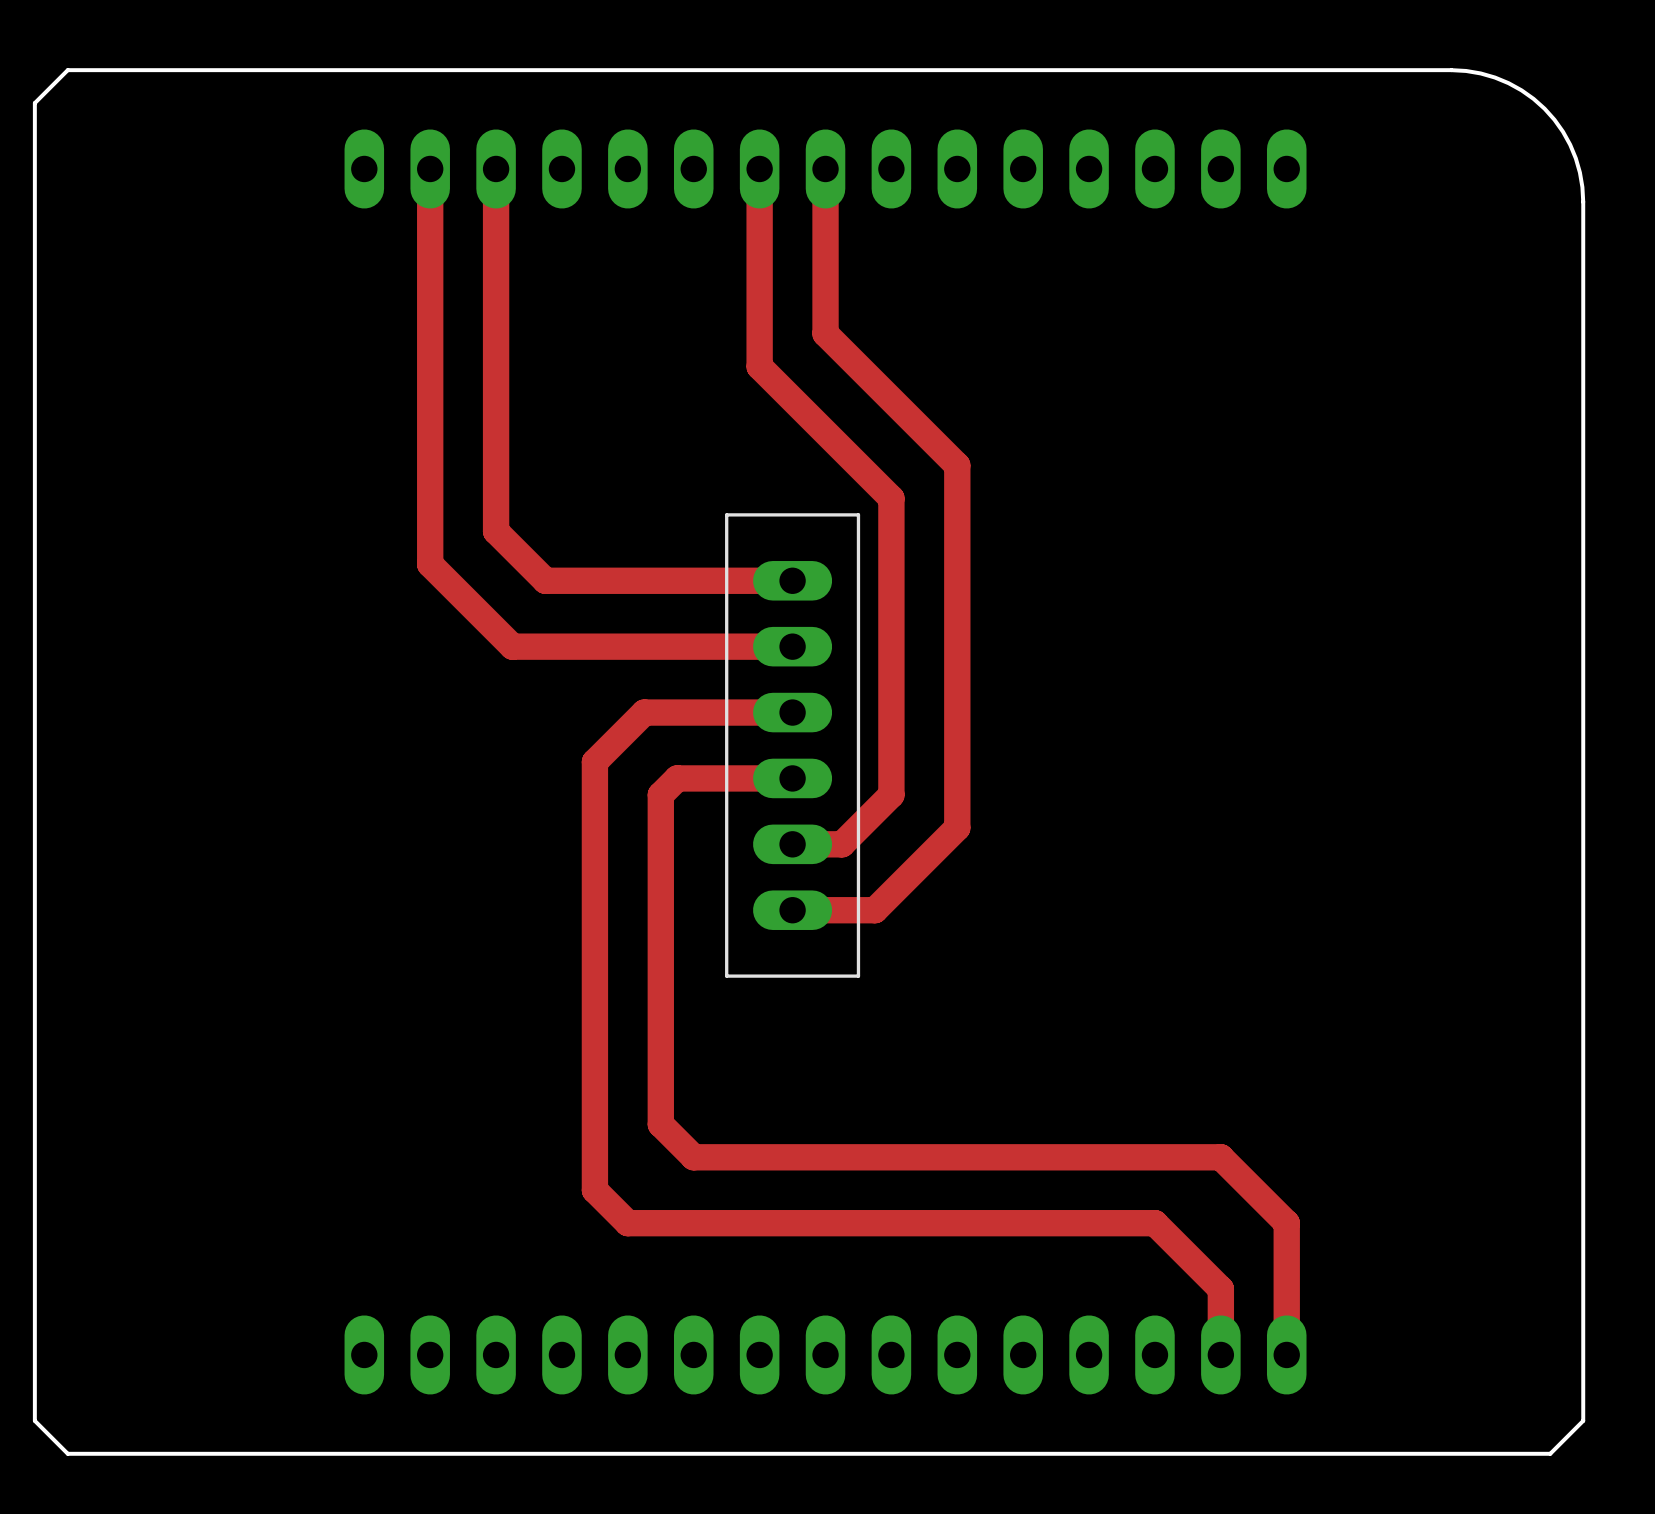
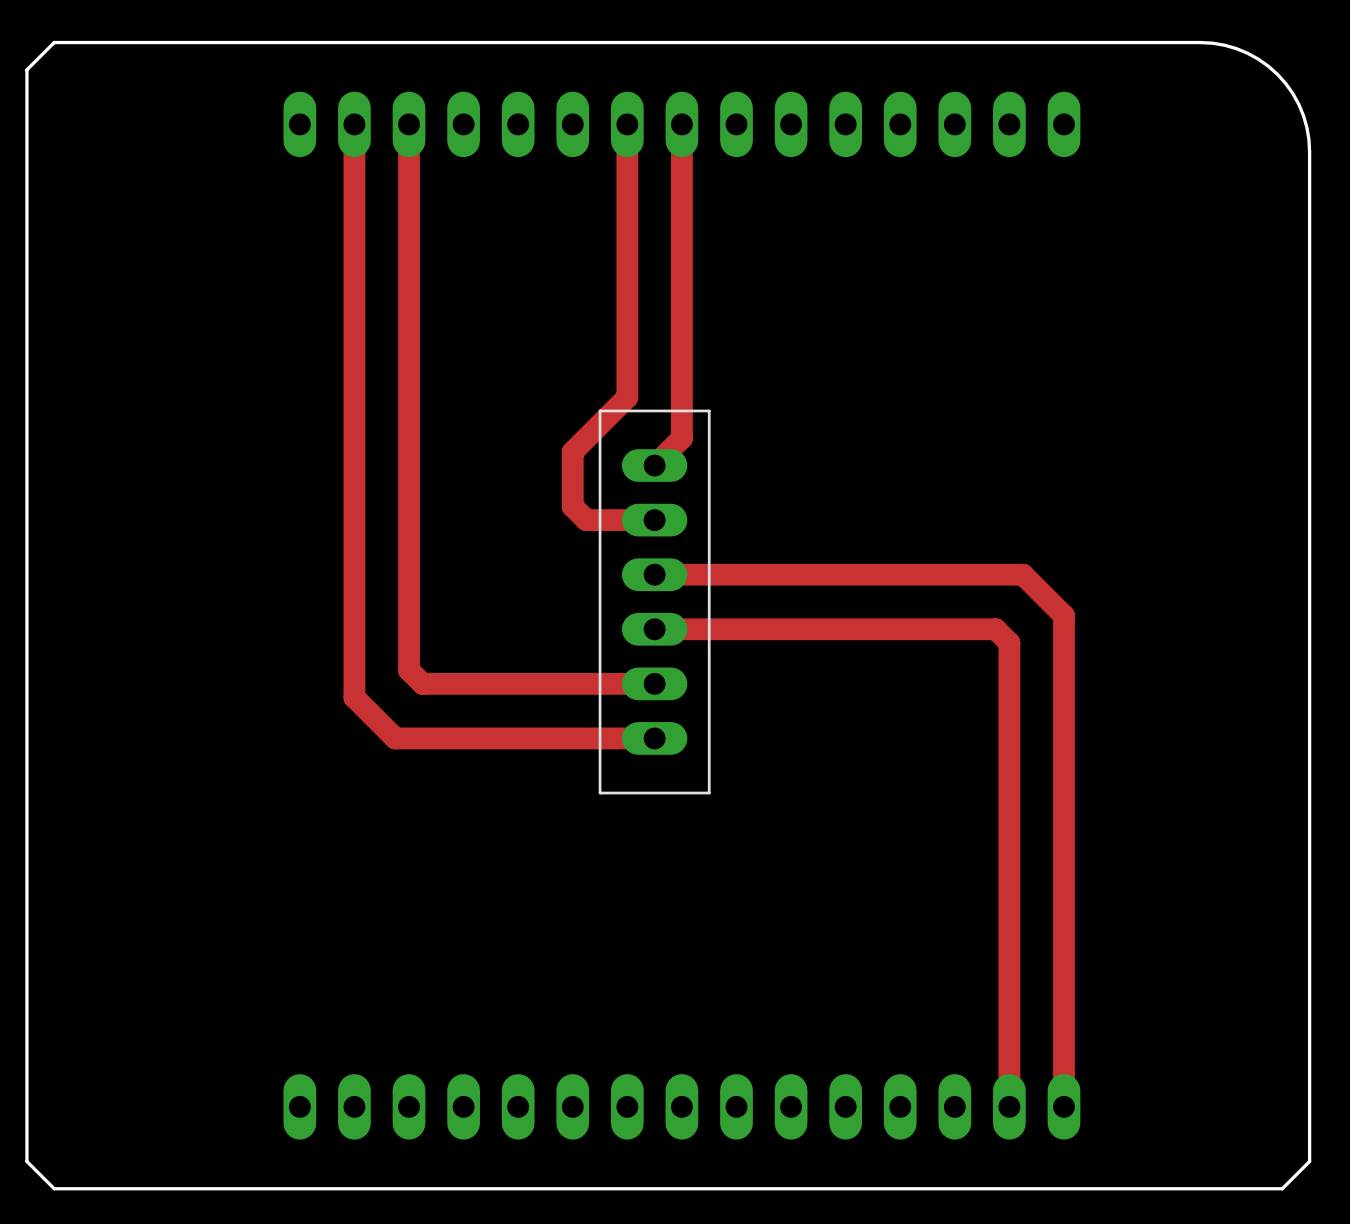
top track: (825, 333) (957, 465) (957, 827) (874, 910) (792, 910) -> (681, 260) (681, 438) (654, 465)
top track: (759, 366) (891, 498) (891, 794) (841, 844) (792, 844) -> (627, 288) (627, 397) (572, 451) (572, 506) (586, 520)
top track: (496, 531) (545, 580) (792, 580) -> (409, 424) (409, 670) (422, 683) (654, 683)
top track: (430, 564) (512, 646) (710, 646) -> (354, 451) (354, 697) (395, 738) (654, 738)
top track: (792, 712) (644, 712) (594, 761) (594, 1190) (627, 1223) (1154, 1223) (1220, 1289) -> (654, 629) (995, 629) (1009, 642) (1009, 1052)
top track: (792, 778) (677, 778) (660, 794) (660, 1124) (693, 1157) (1220, 1157) (1286, 1223) -> (654, 574) (1023, 574) (1063, 615) (1063, 997)

